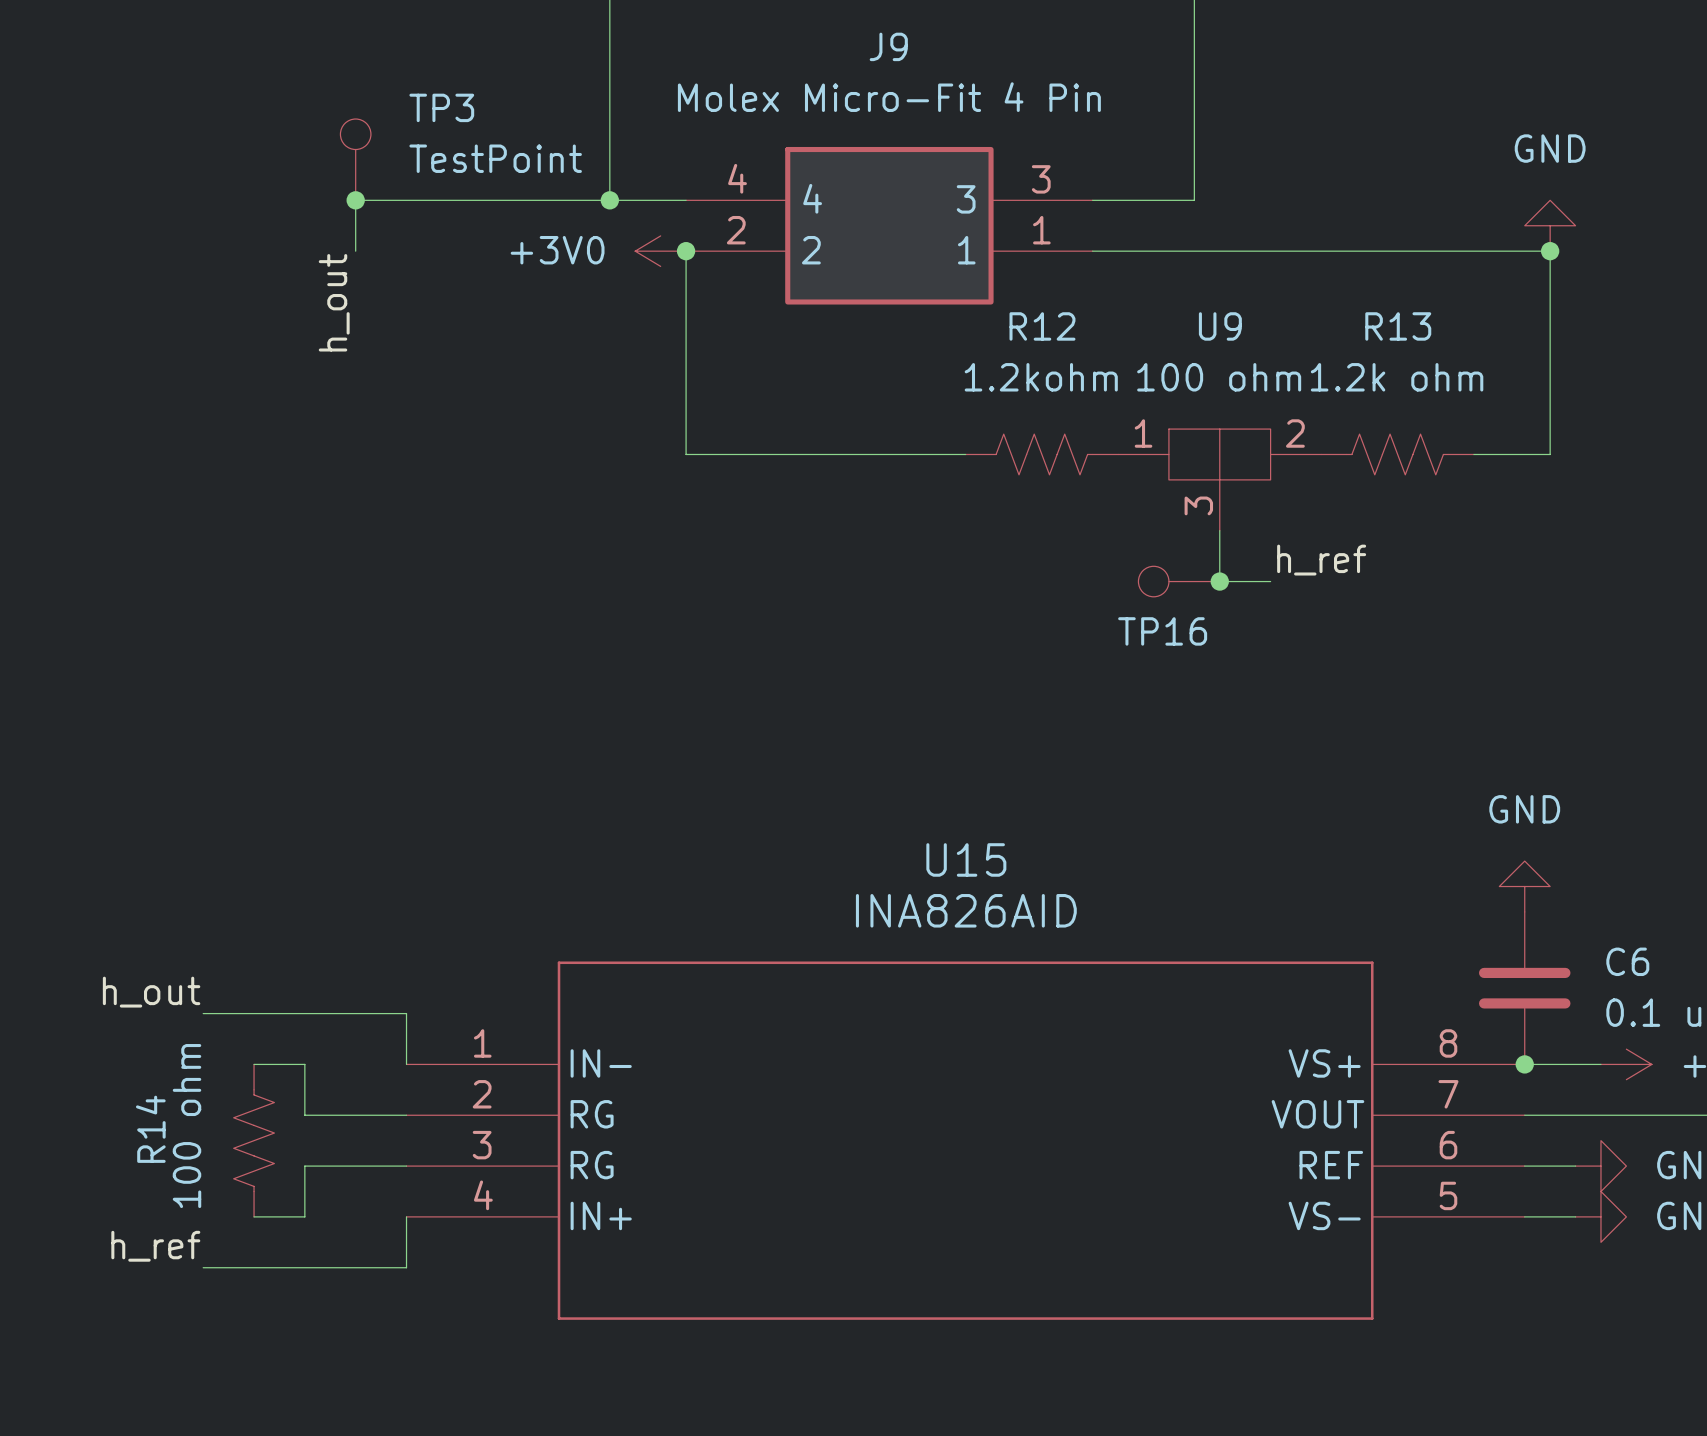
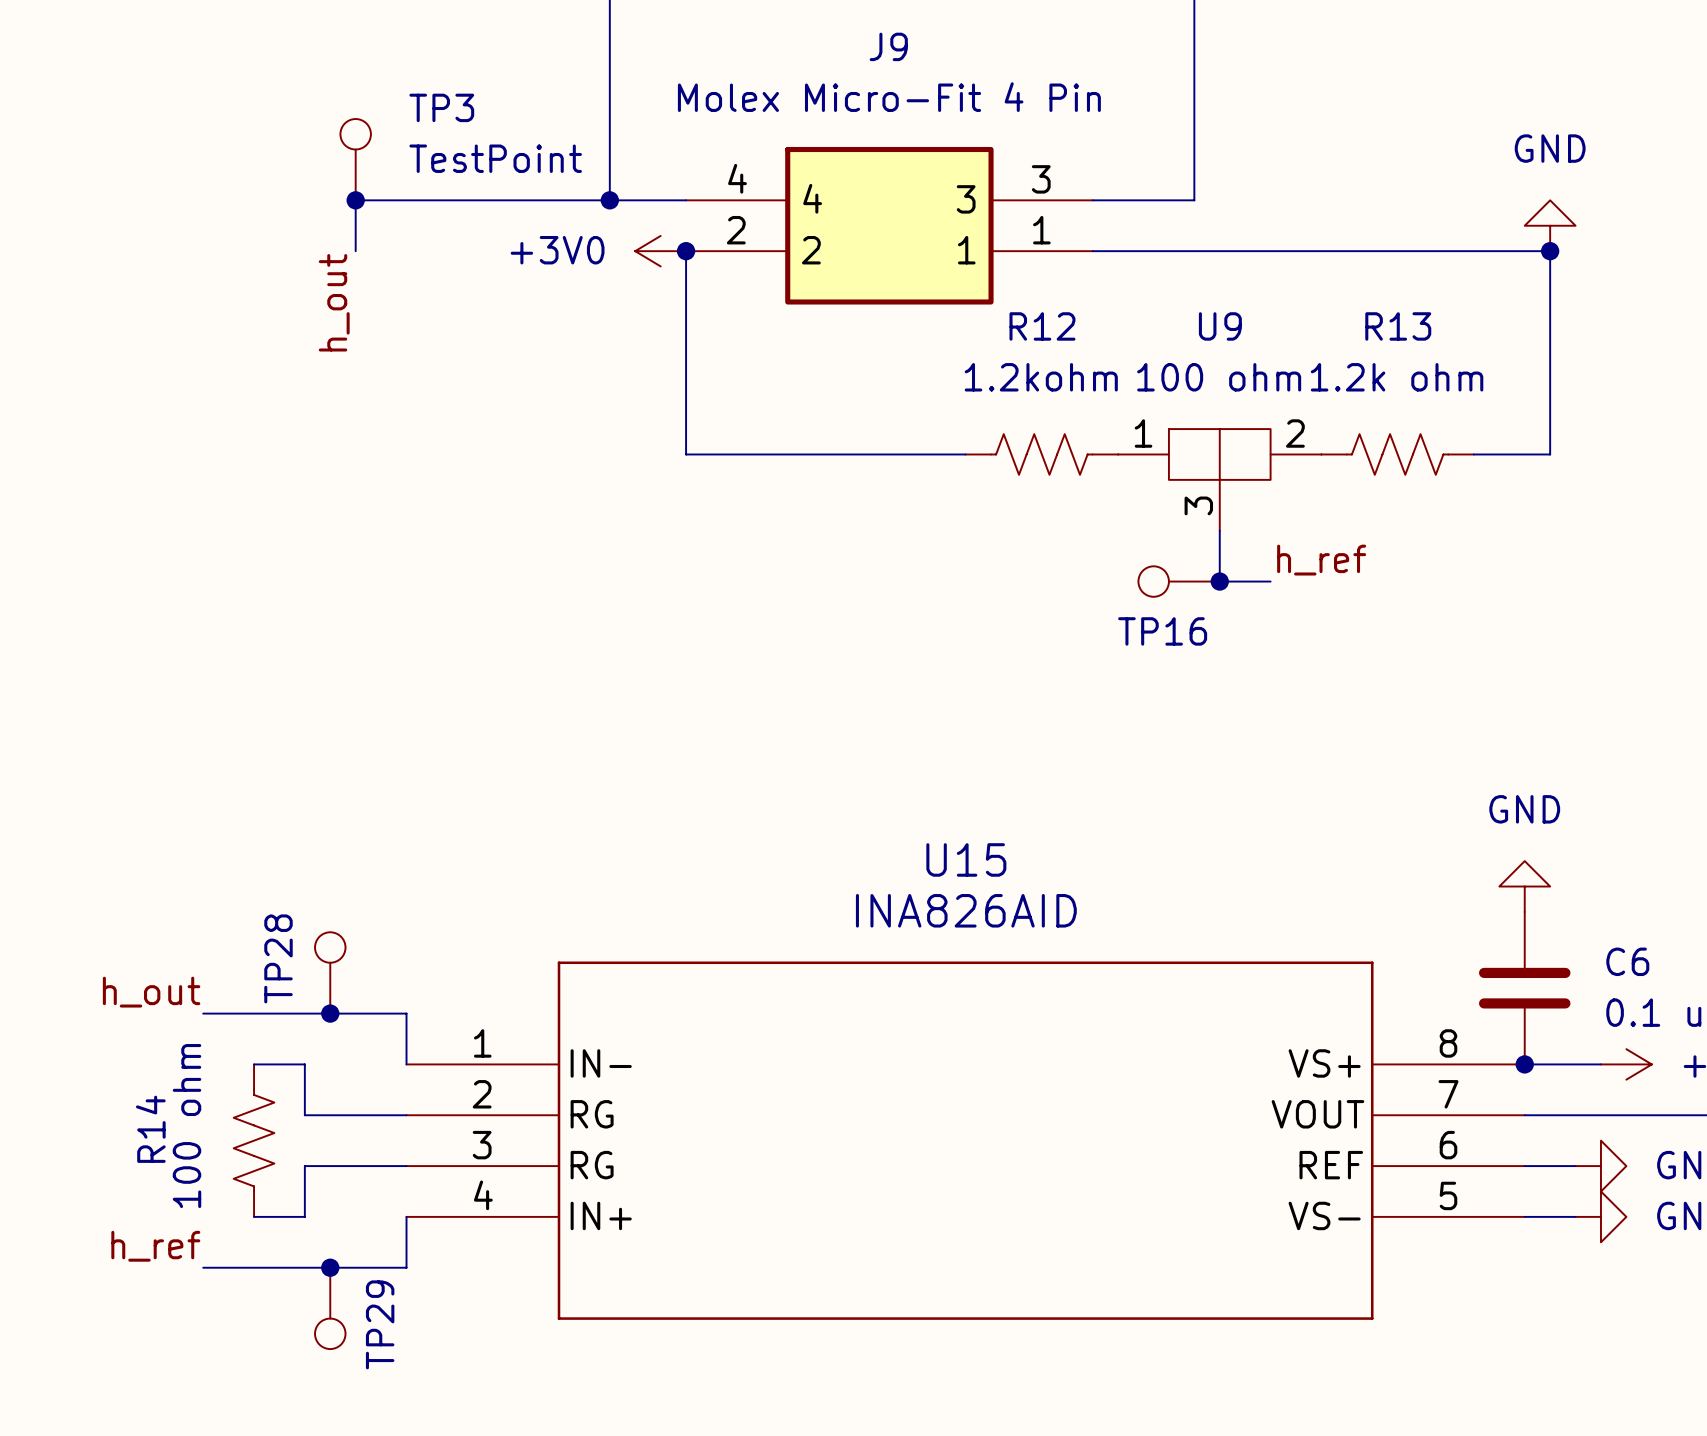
TP28: none -> (330, 972)
junction: none -> (330, 1013)
junction: none -> (330, 1267)
TP29: none -> (330, 1308)

